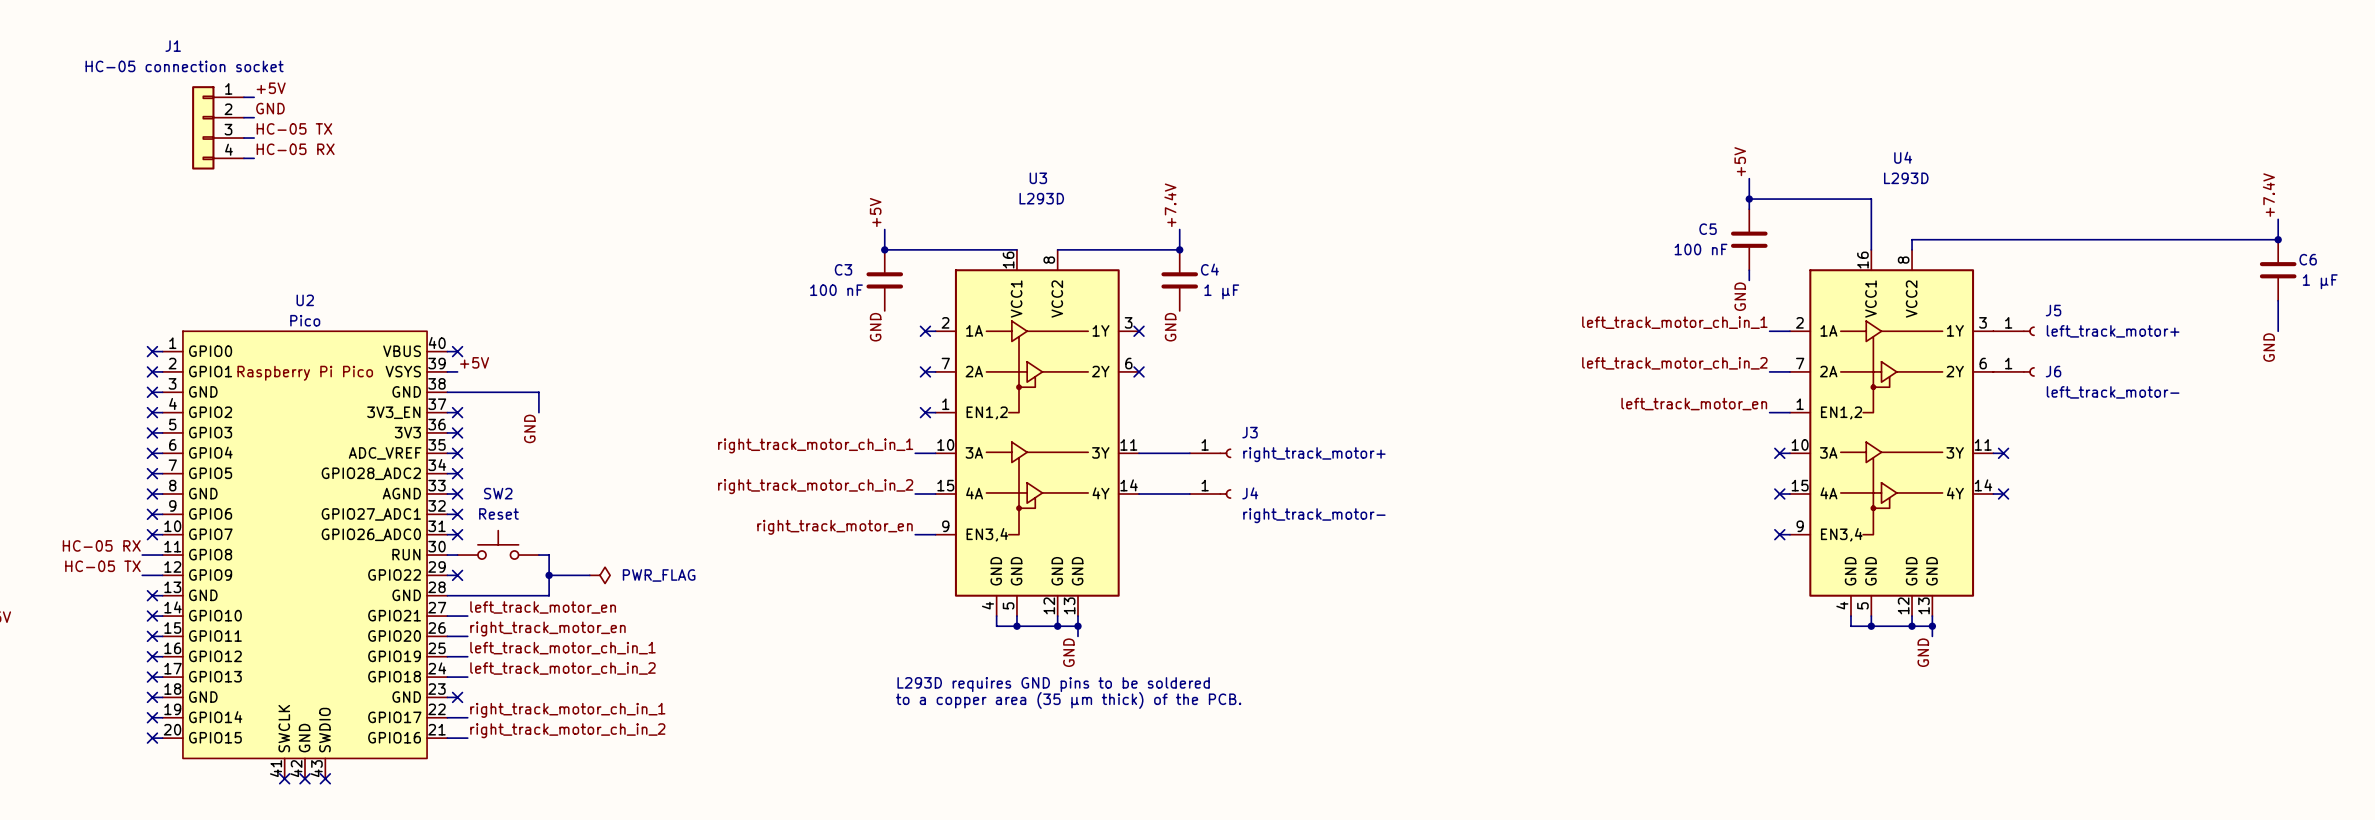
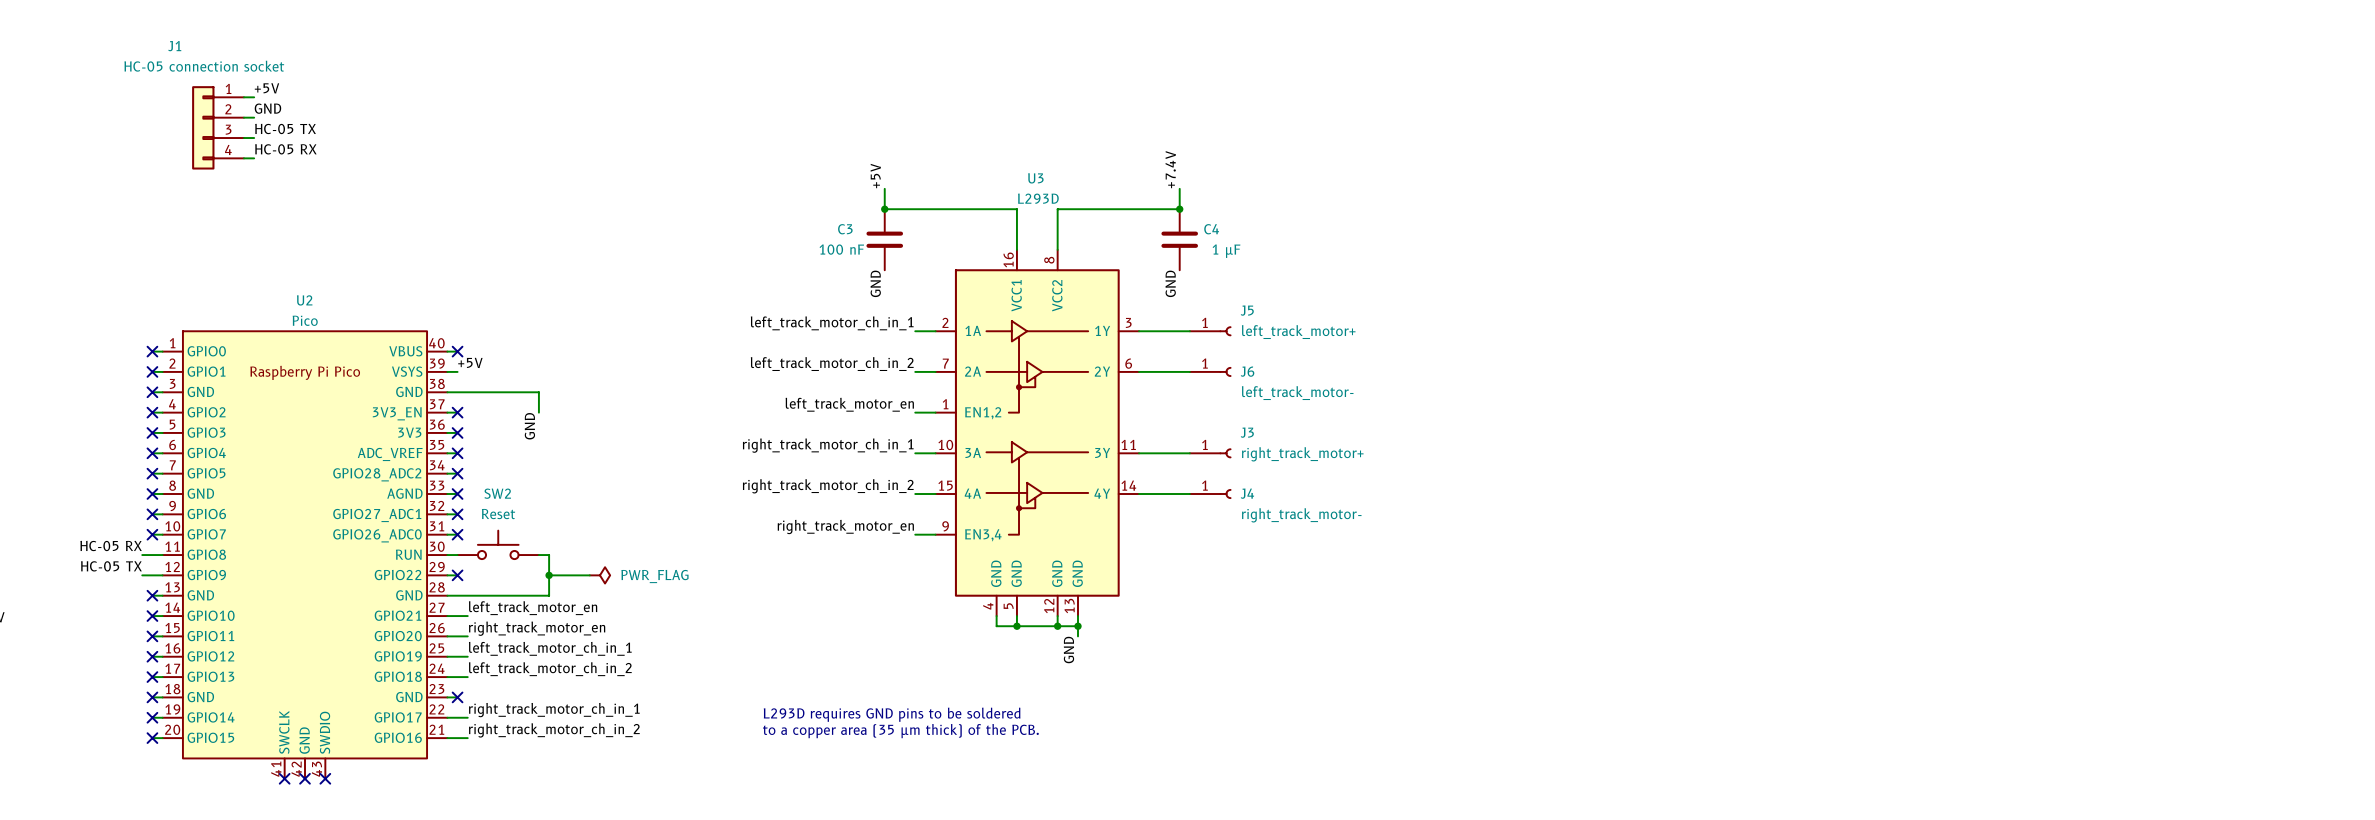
label: +5V (1740, 161) -> none
wire: (1749, 178) (1749, 209) -> none
label: +7.4V (2268, 195) -> none
wire: (1749, 199) (1871, 199) (1871, 249) -> none
junction: (1749, 199) -> none
label position: +7.4V (1170, 205) -> +7.4V (1170, 169)
label position: +5V (875, 212) -> +5V (875, 176)
wire: (2278, 219) (2278, 239) (1912, 239) (1912, 249) -> none
wire: (884, 229) (884, 249) (1016, 249) -> (884, 188) (884, 209) (1016, 209) (1016, 249)
wire: (1179, 229) (1179, 249) (1057, 249) -> (1179, 188) (1179, 209) (1057, 209) (1057, 249)
C5: 100 nF (1749, 239) -> none
junction: (2278, 239) -> none
junction position: (884, 249) -> (884, 209)
junction position: (1179, 249) -> (1179, 209)
wire: (1749, 270) (1749, 280) -> none
C6: 1 µF (2278, 270) -> none
C3 position: (884, 280) -> (884, 239)
C4 position: (1179, 280) -> (1179, 239)
label: GND (1740, 296) -> none
wire: (2278, 300) (2278, 331) -> none
label: none -> left_track_motor_ch_in_1 (832, 323)
label: left_track_motor_ch_in_1 (1674, 322) -> none
label position: GND (875, 327) -> GND (875, 283)
label position: GND (1170, 327) -> GND (1170, 283)
wire: none -> (915, 331) (925, 331)
no-connect mark: (925, 331) -> none
wire: none -> (1139, 331) (1189, 331)
no-connect mark: (1139, 331) -> none
wire: (1769, 331) (1789, 331) -> none
J5 position: (2014, 331) -> (1210, 331)
label: GND (2269, 347) -> none
label: none -> left_track_motor_ch_in_2 (832, 364)
label: left_track_motor_ch_in_2 (1674, 363) -> none
wire: none -> (915, 371) (925, 371)
no-connect mark: (925, 371) -> none
wire: none -> (1139, 371) (1189, 371)
no-connect mark: (1139, 371) -> none
wire: (1769, 371) (1789, 371) -> none
J6 position: (2014, 371) -> (1210, 371)
label: none -> left_track_motor_en (849, 404)
label: left_track_motor_en (1694, 404) -> none
wire: none -> (915, 412) (925, 412)
no-connect mark: (925, 412) -> none
wire: (1769, 412) (1789, 412) -> none
U4: L293D (1891, 432) -> none
wire: (1779, 453) (1789, 453) -> none
no-connect mark: (1779, 453) -> none
wire: (1993, 453) (2003, 453) -> none
no-connect mark: (2003, 453) -> none
wire: (1779, 494) (1789, 494) -> none
no-connect mark: (1779, 494) -> none
wire: (1993, 494) (2003, 494) -> none
no-connect mark: (2003, 494) -> none
wire: (1779, 534) (1789, 534) -> none
no-connect mark: (1779, 534) -> none
wire: (1850, 616) (1850, 626) (1932, 626) -> none
wire: (1871, 616) (1871, 626) -> none
wire: (1912, 616) (1912, 626) -> none
wire: (1932, 616) (1932, 636) -> none
junction: (1871, 626) -> none
junction: (1912, 626) -> none
junction: (1932, 626) -> none
label: GND (1923, 652) -> none
text position: L293D requires GND pins to be soldered (1053, 684) -> L293D requires GND pins to be soldered (892, 714)
text position: to a copper area (35 µm thick) of the PCB. (1068, 700) -> to a copper area (35 µm thick) of the PCB. (900, 731)

